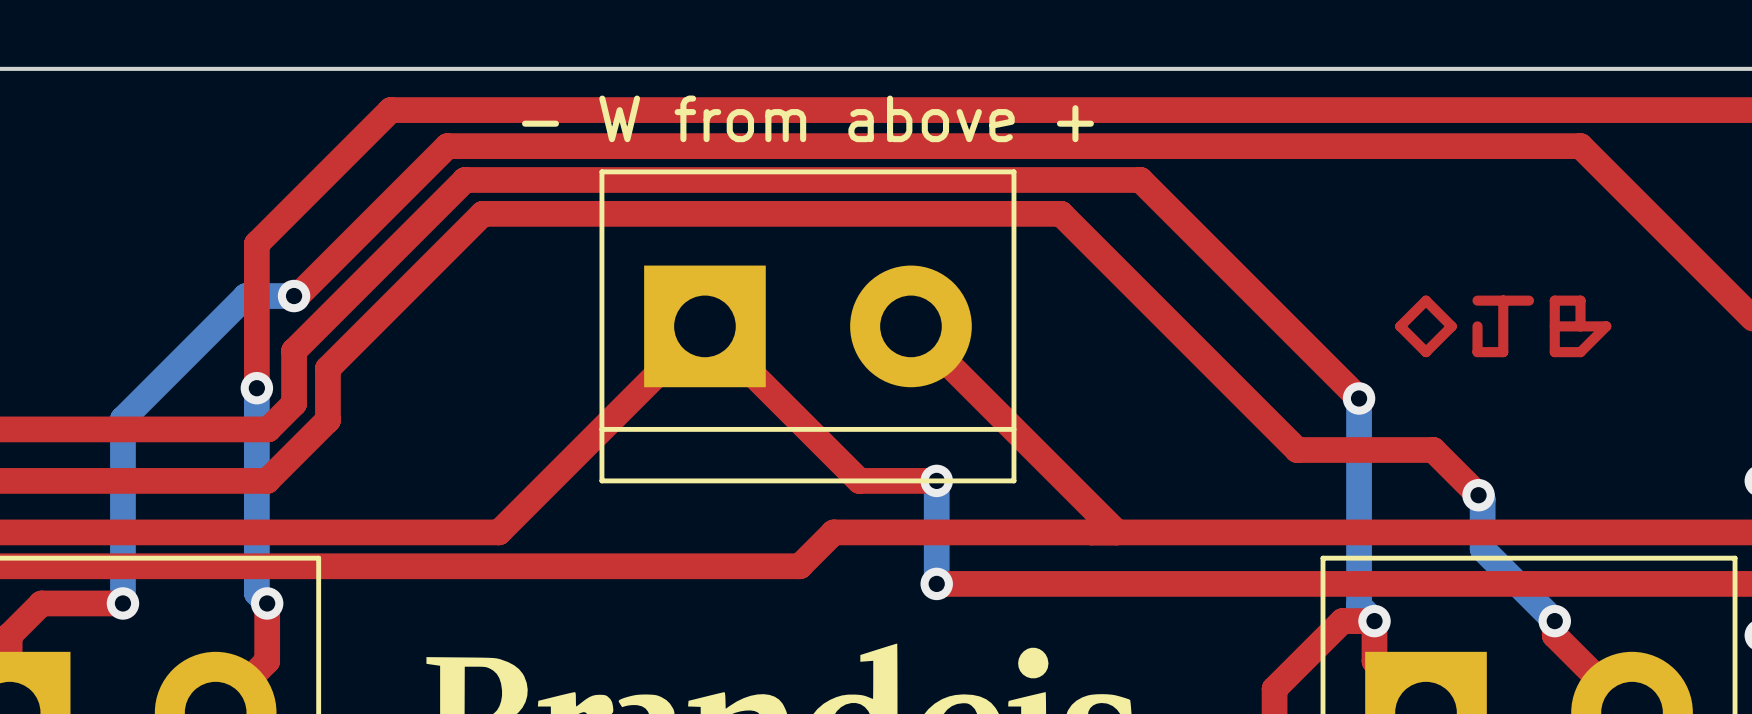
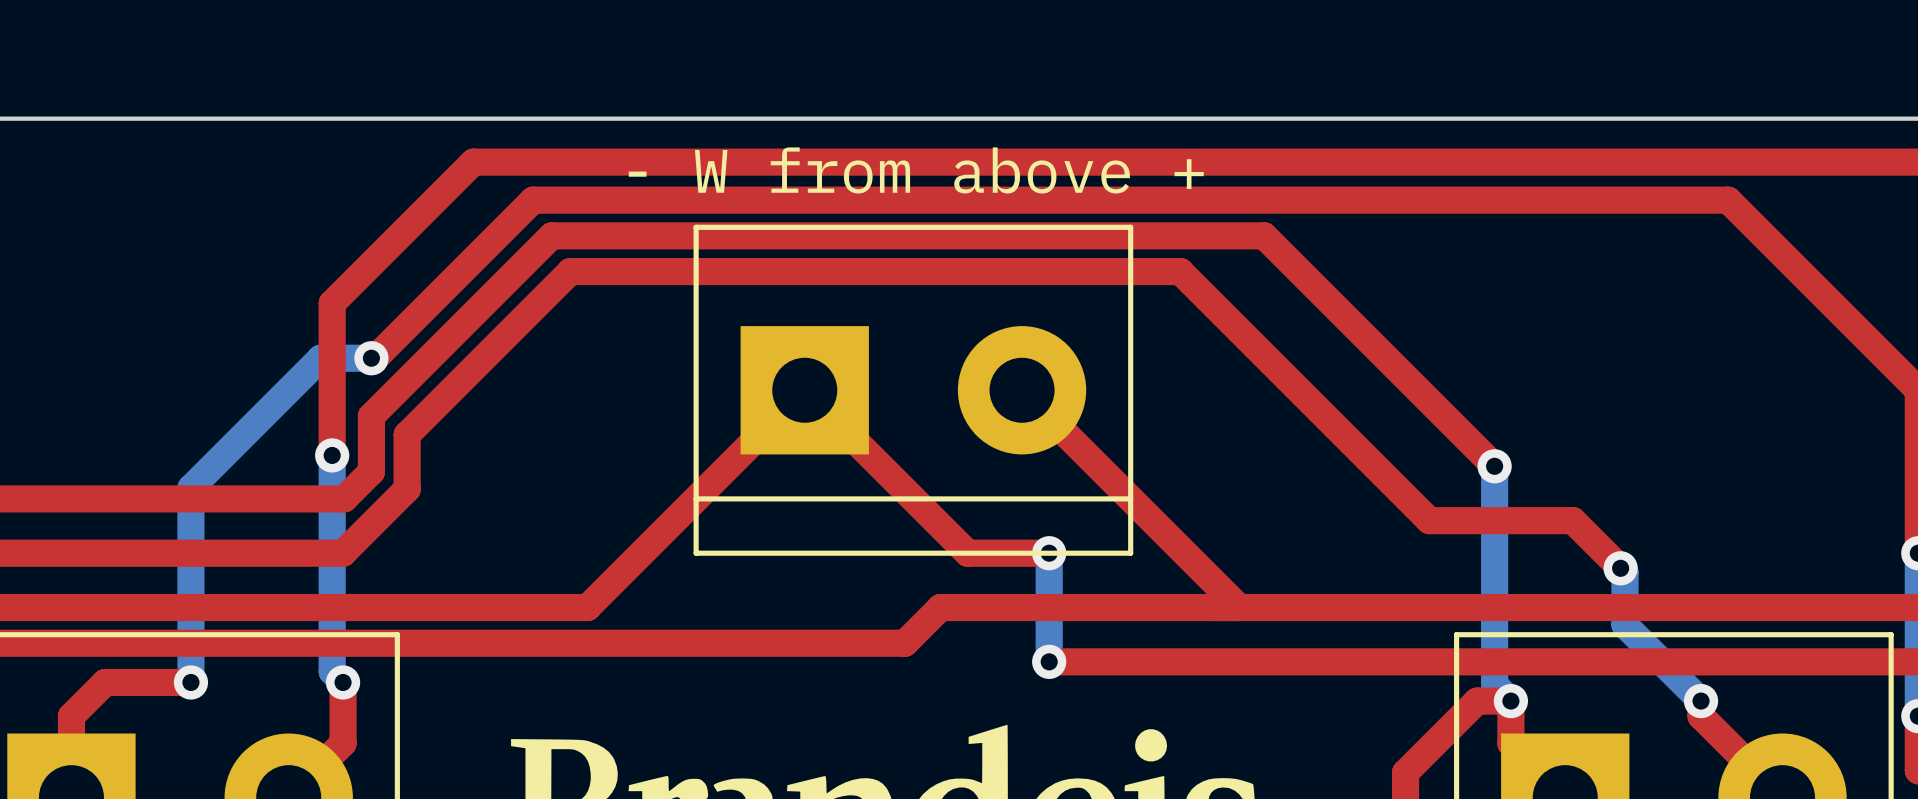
top track: (1426, 300) (1400, 326) (1426, 352) (1451, 326) (1426, 300) -> none
top track: (1477, 300) (1529, 300) -> none
top track: (1503, 300) (1503, 352) (1477, 352) (1477, 326) -> none
top track: (1554, 326) (1606, 326) (1580, 352) (1554, 352) (1554, 300) (1580, 300) (1580, 326) -> none

